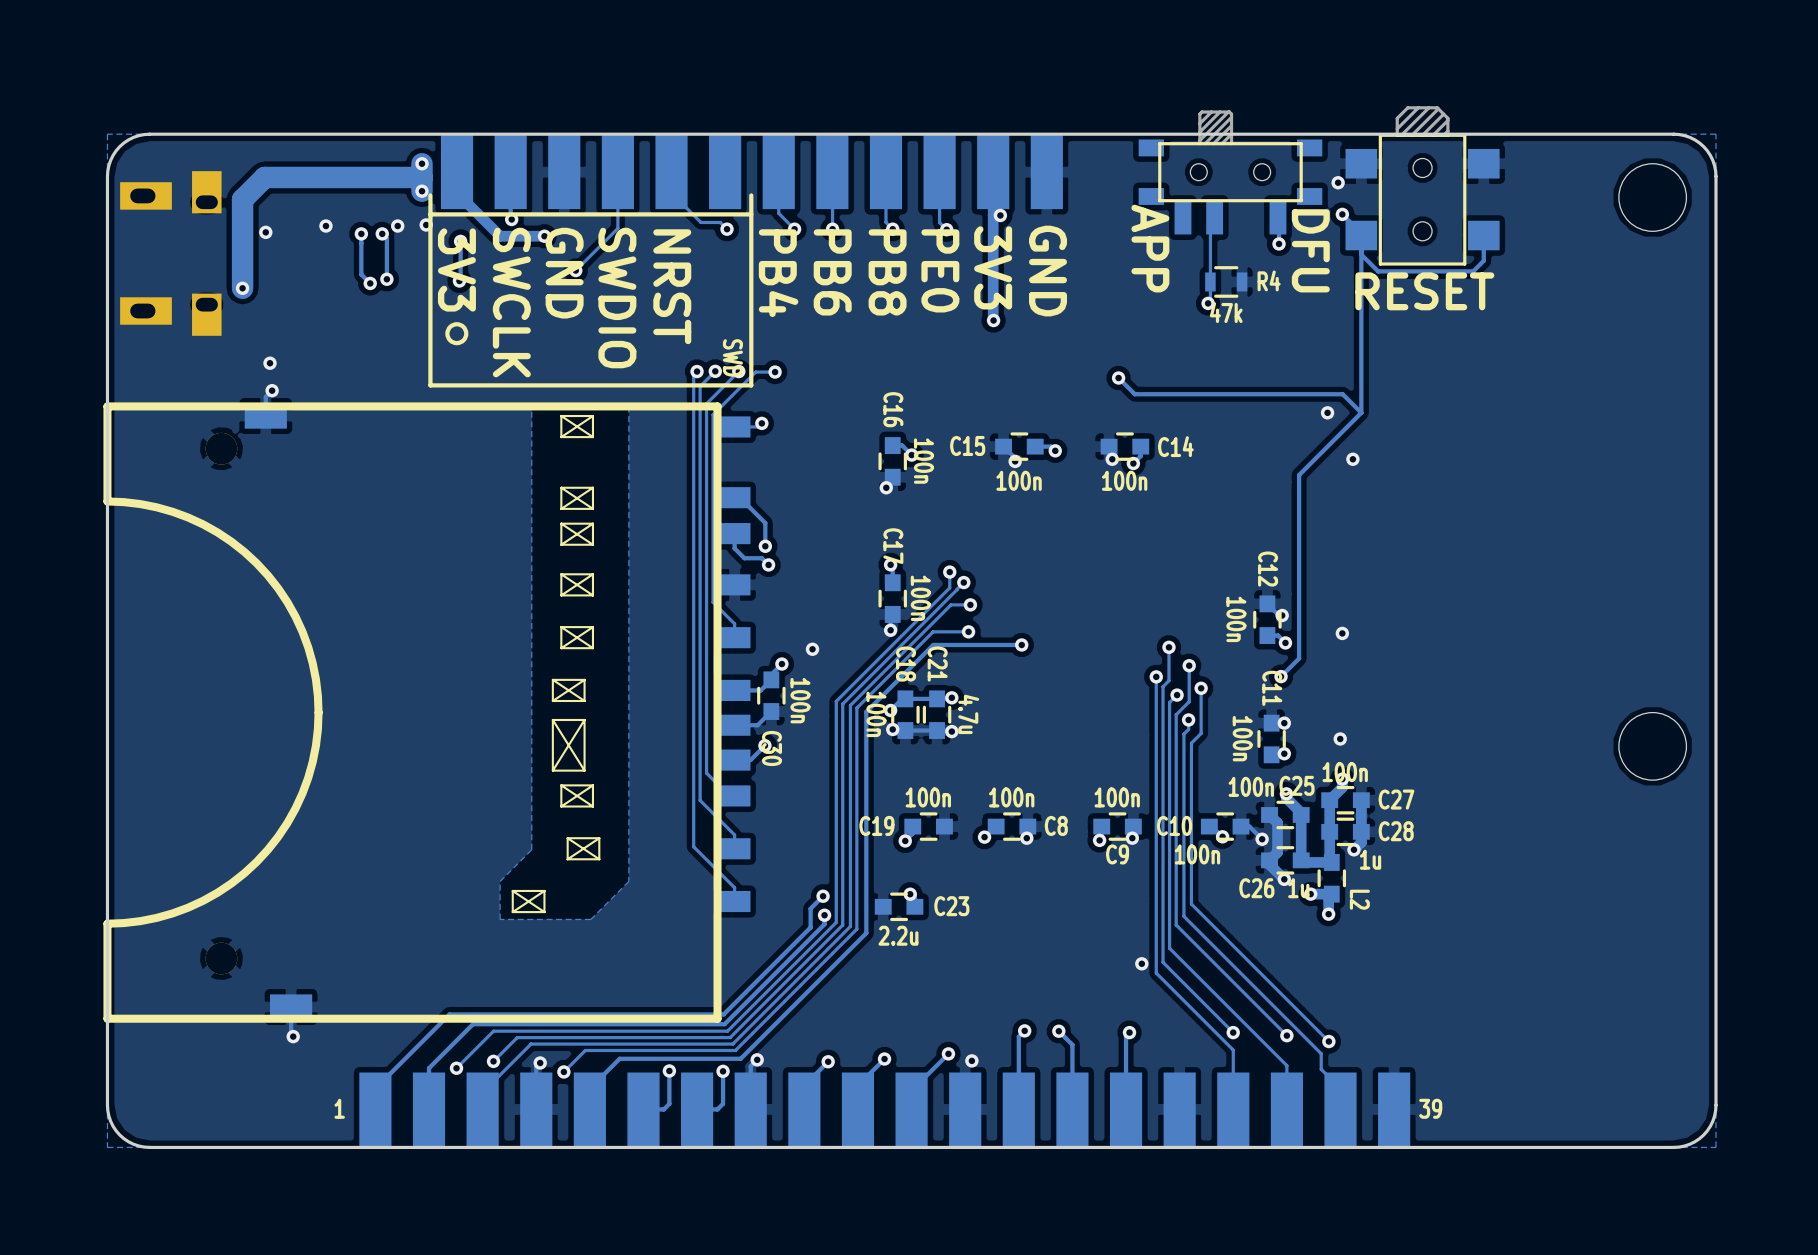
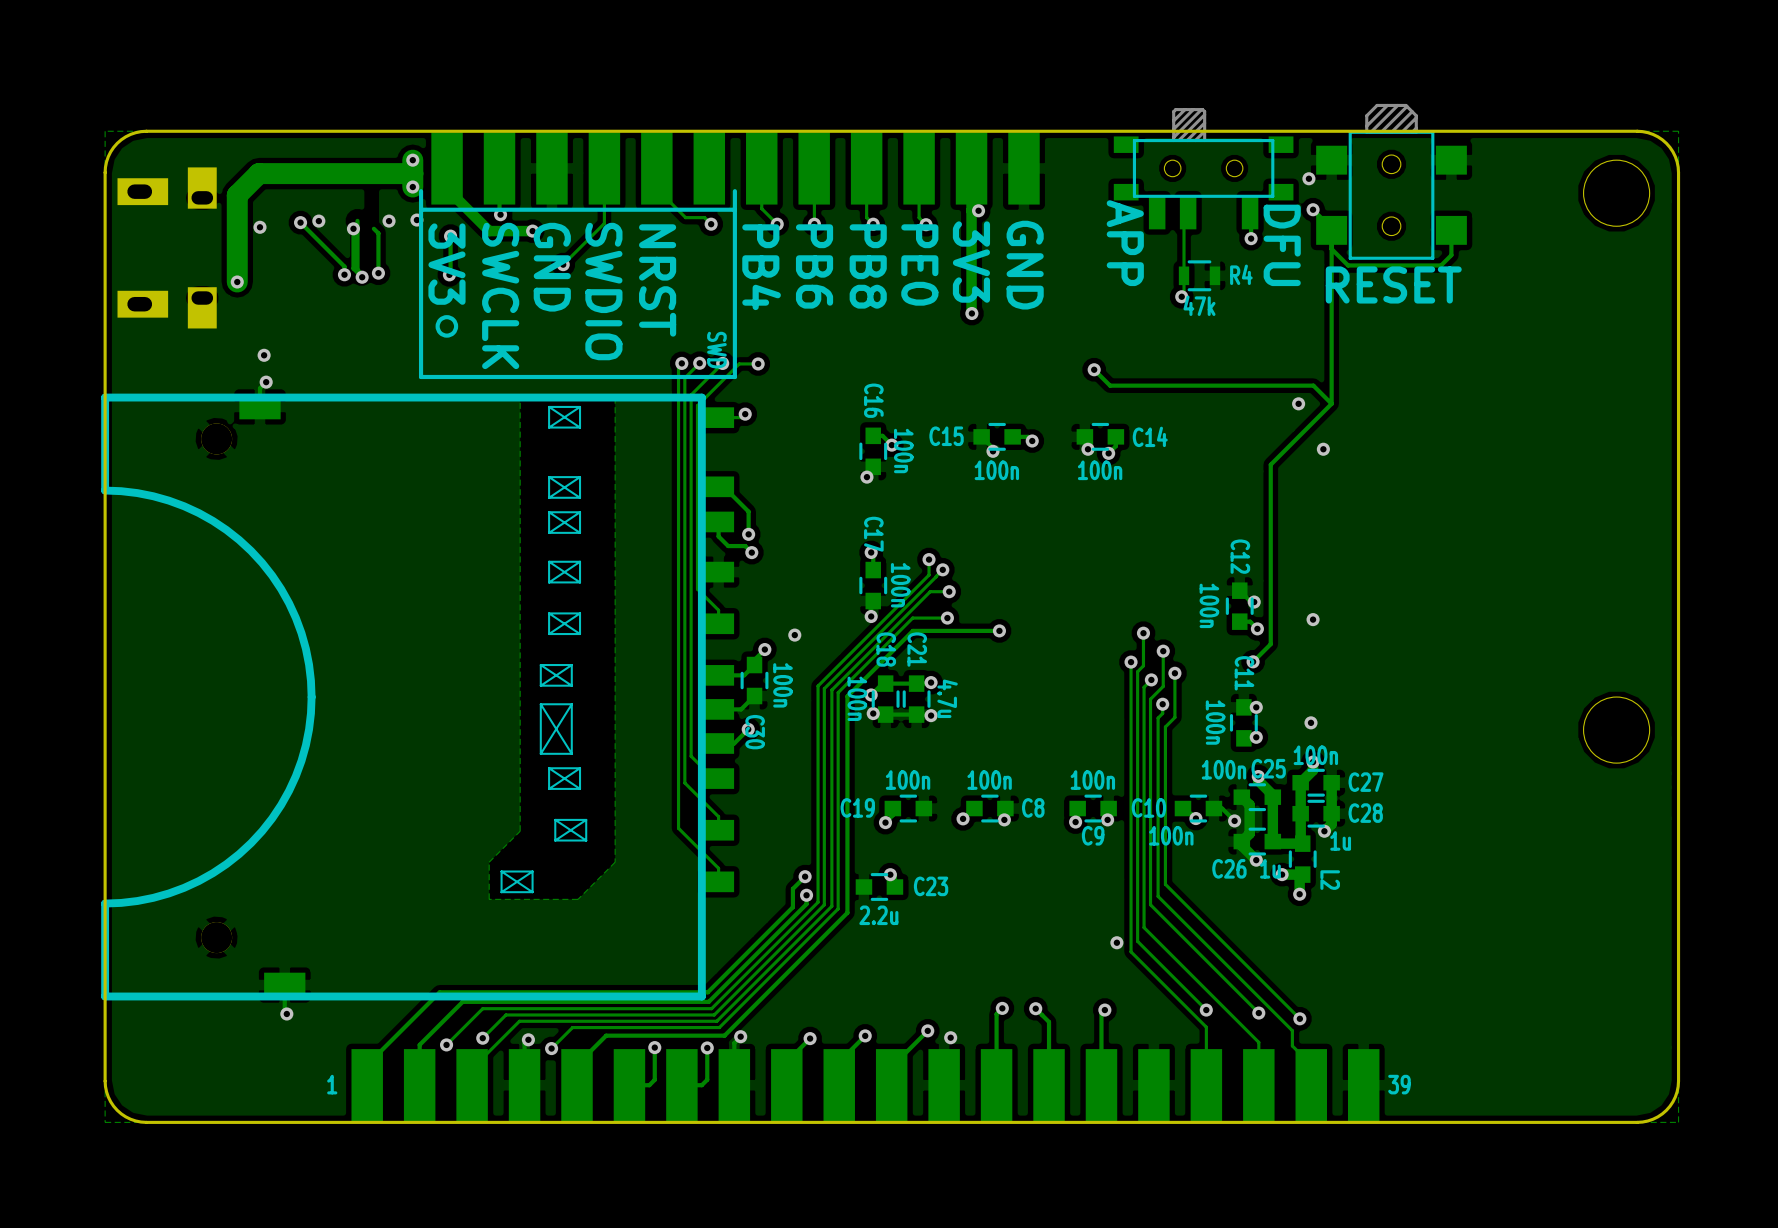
track: none -> (357, 220) (357, 269) (361, 273)
track: none -> (300, 222) (344, 266) (344, 274)
via: none -> (300, 222)
via: (382, 233) -> none
via: none -> (344, 274)

